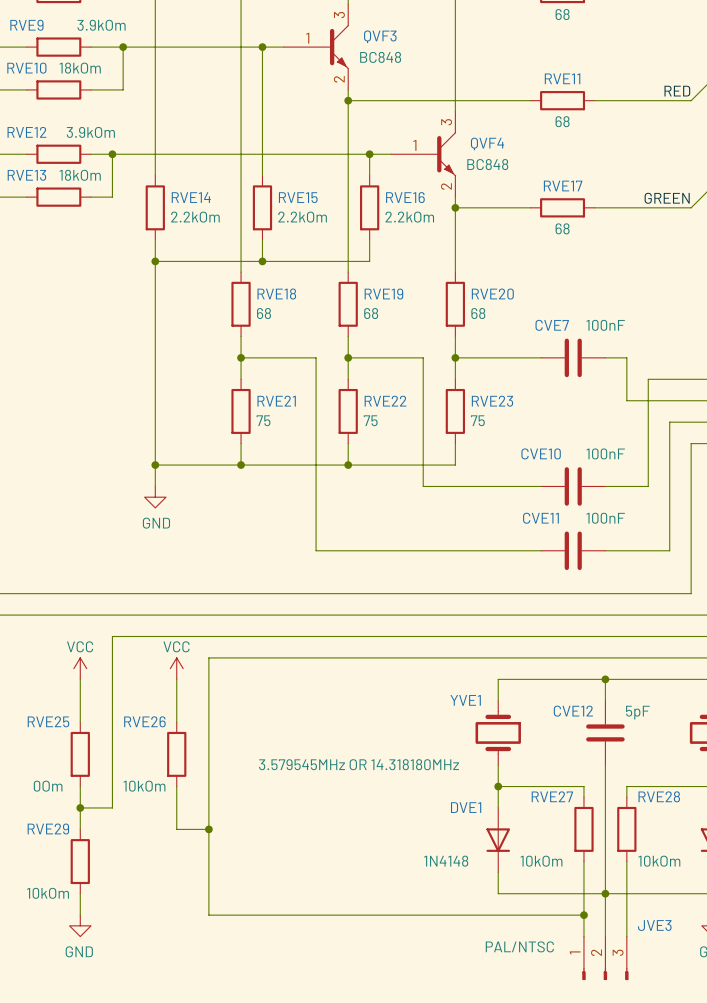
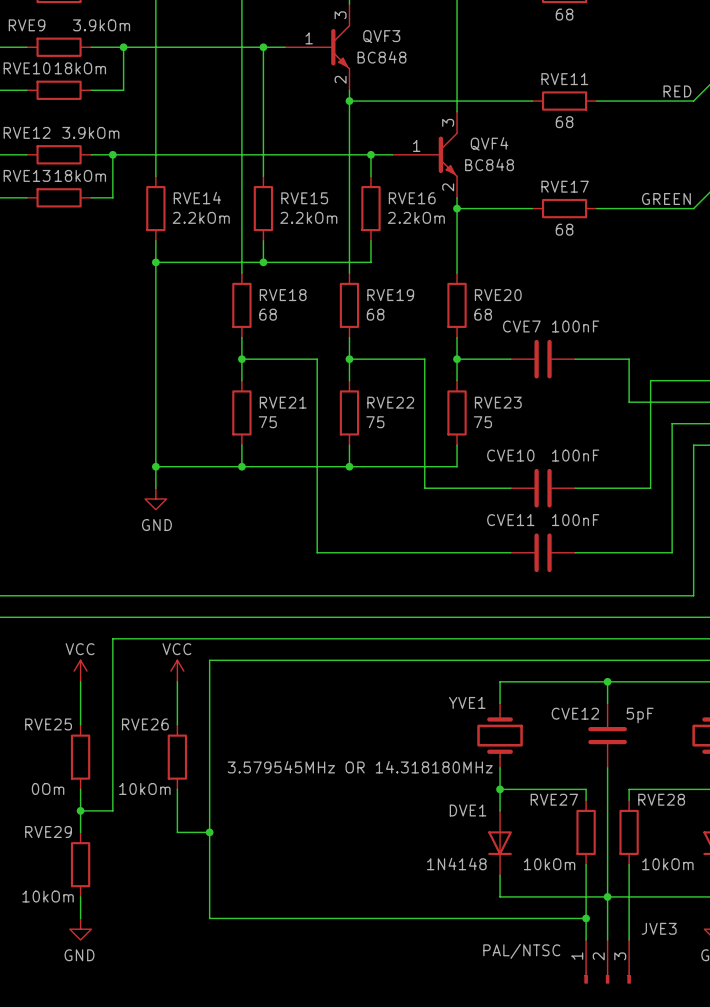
CVE7 position: (573, 357) -> (543, 359)
CVE10 position: (573, 486) -> (543, 488)
CVE11 position: (573, 550) -> (543, 552)

